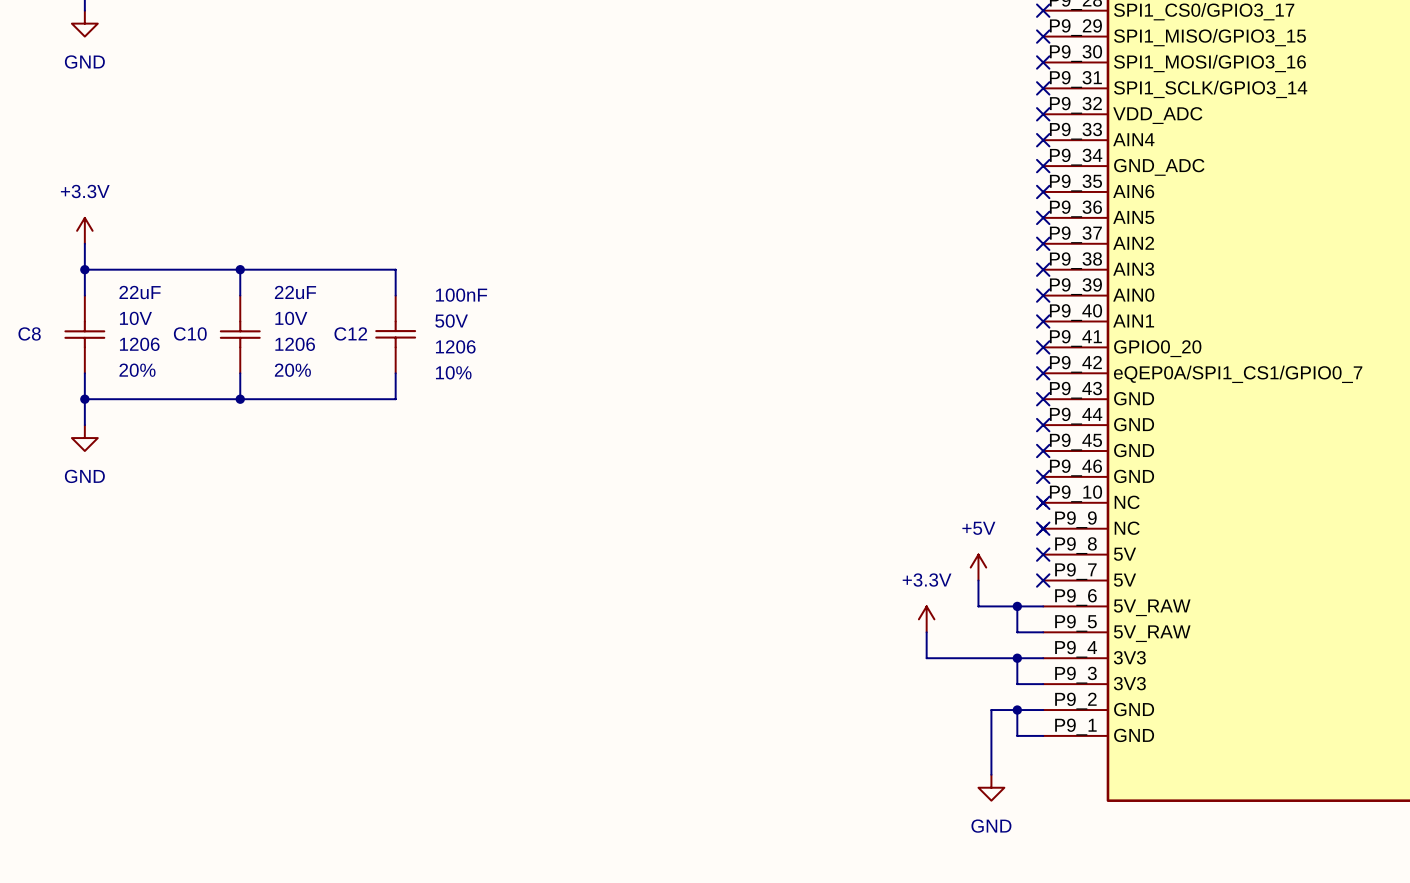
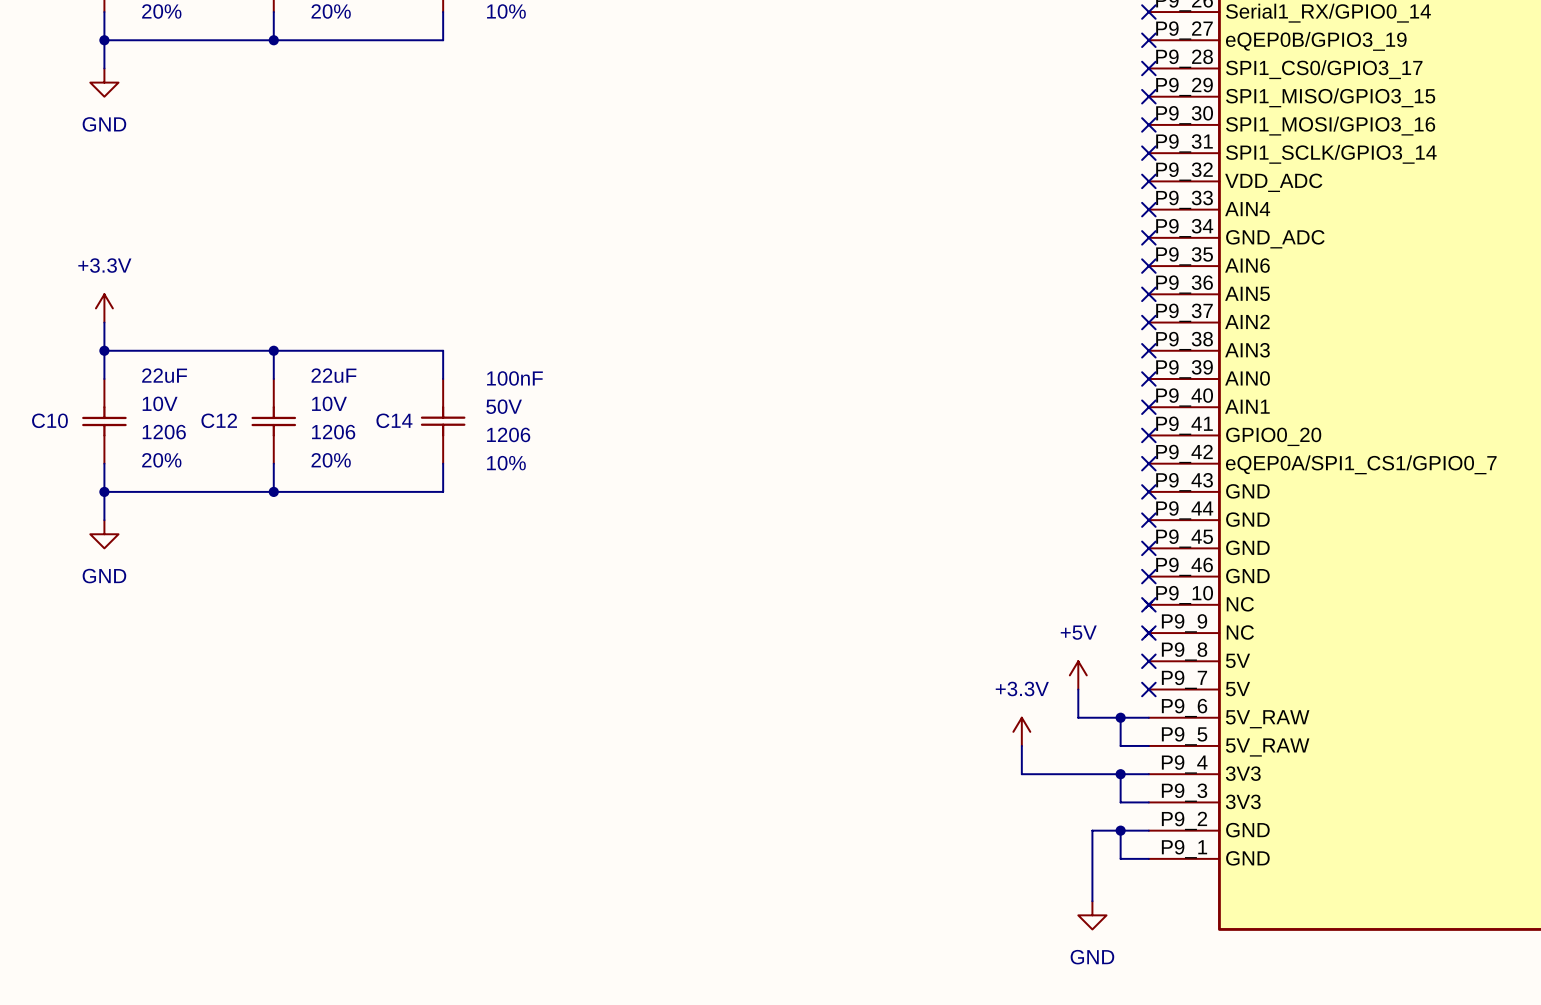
C8 name: C8 (29, 333) -> C10 (49, 420)
C10 name: C10 (190, 333) -> C12 (219, 420)
C12 name: C12 (350, 333) -> C14 (394, 420)

